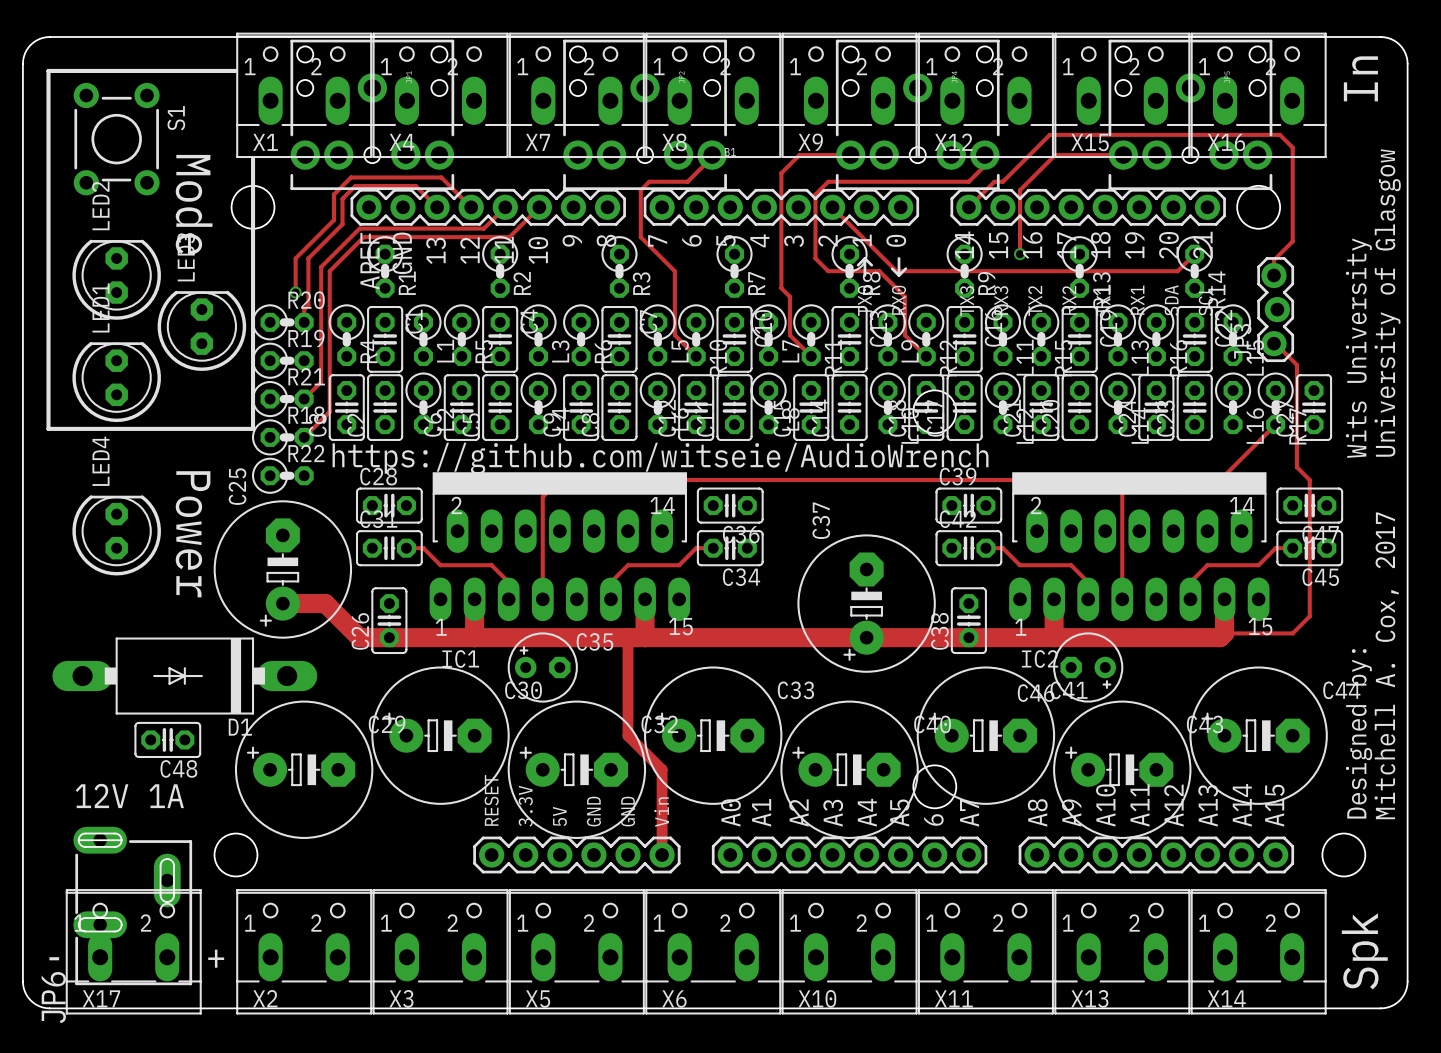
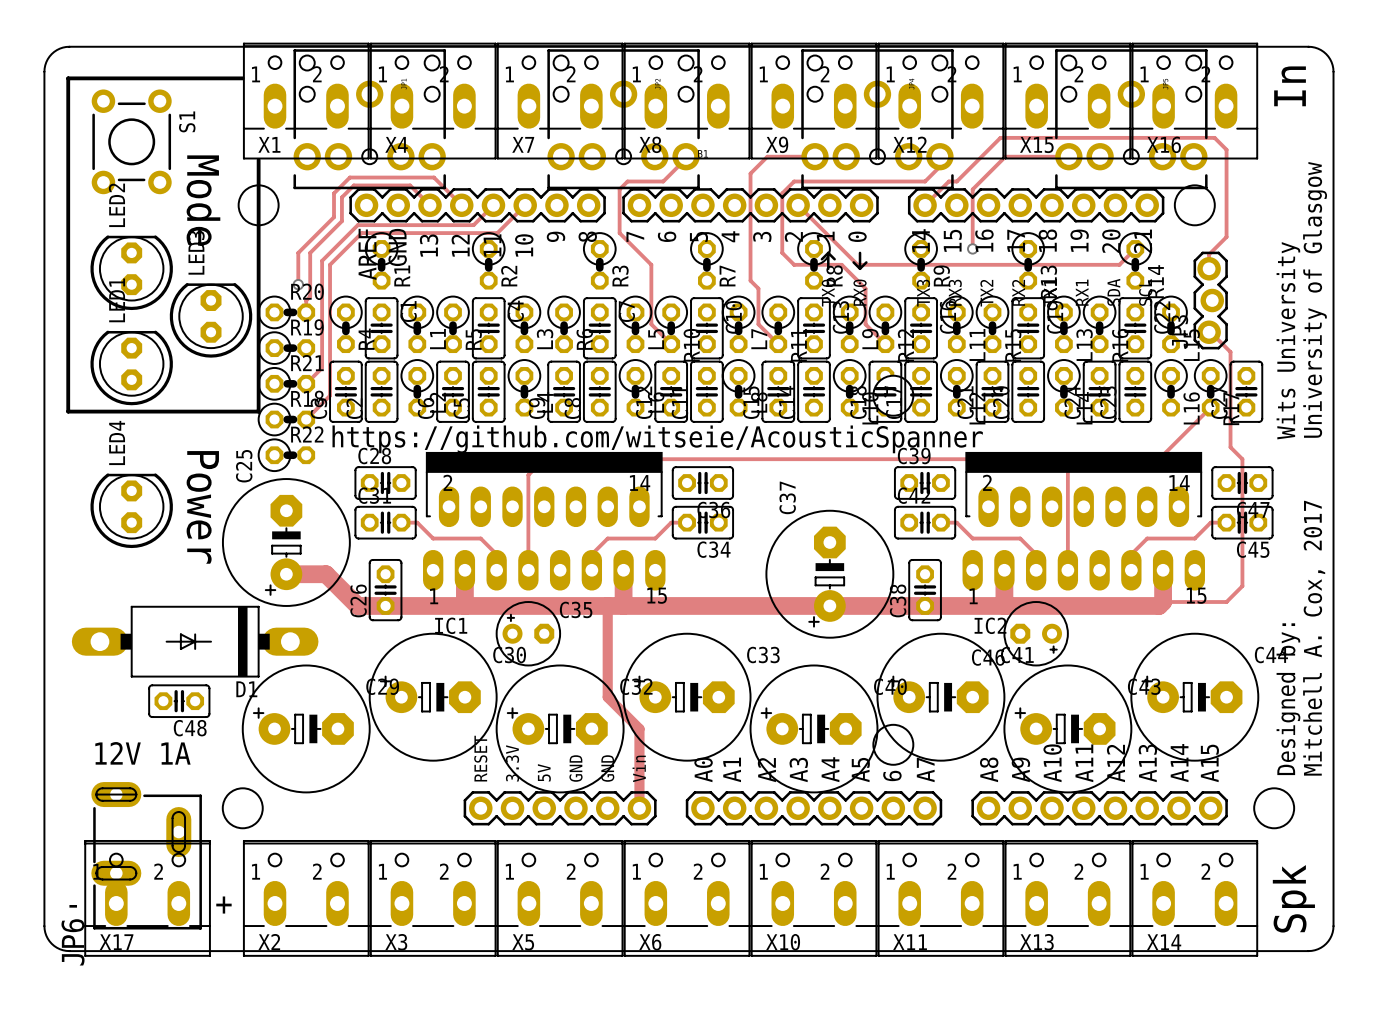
text: https://github.com/witseie/AudioWrench (660, 458) -> https://github.com/witseie/AcousticSpanner (657, 439)

